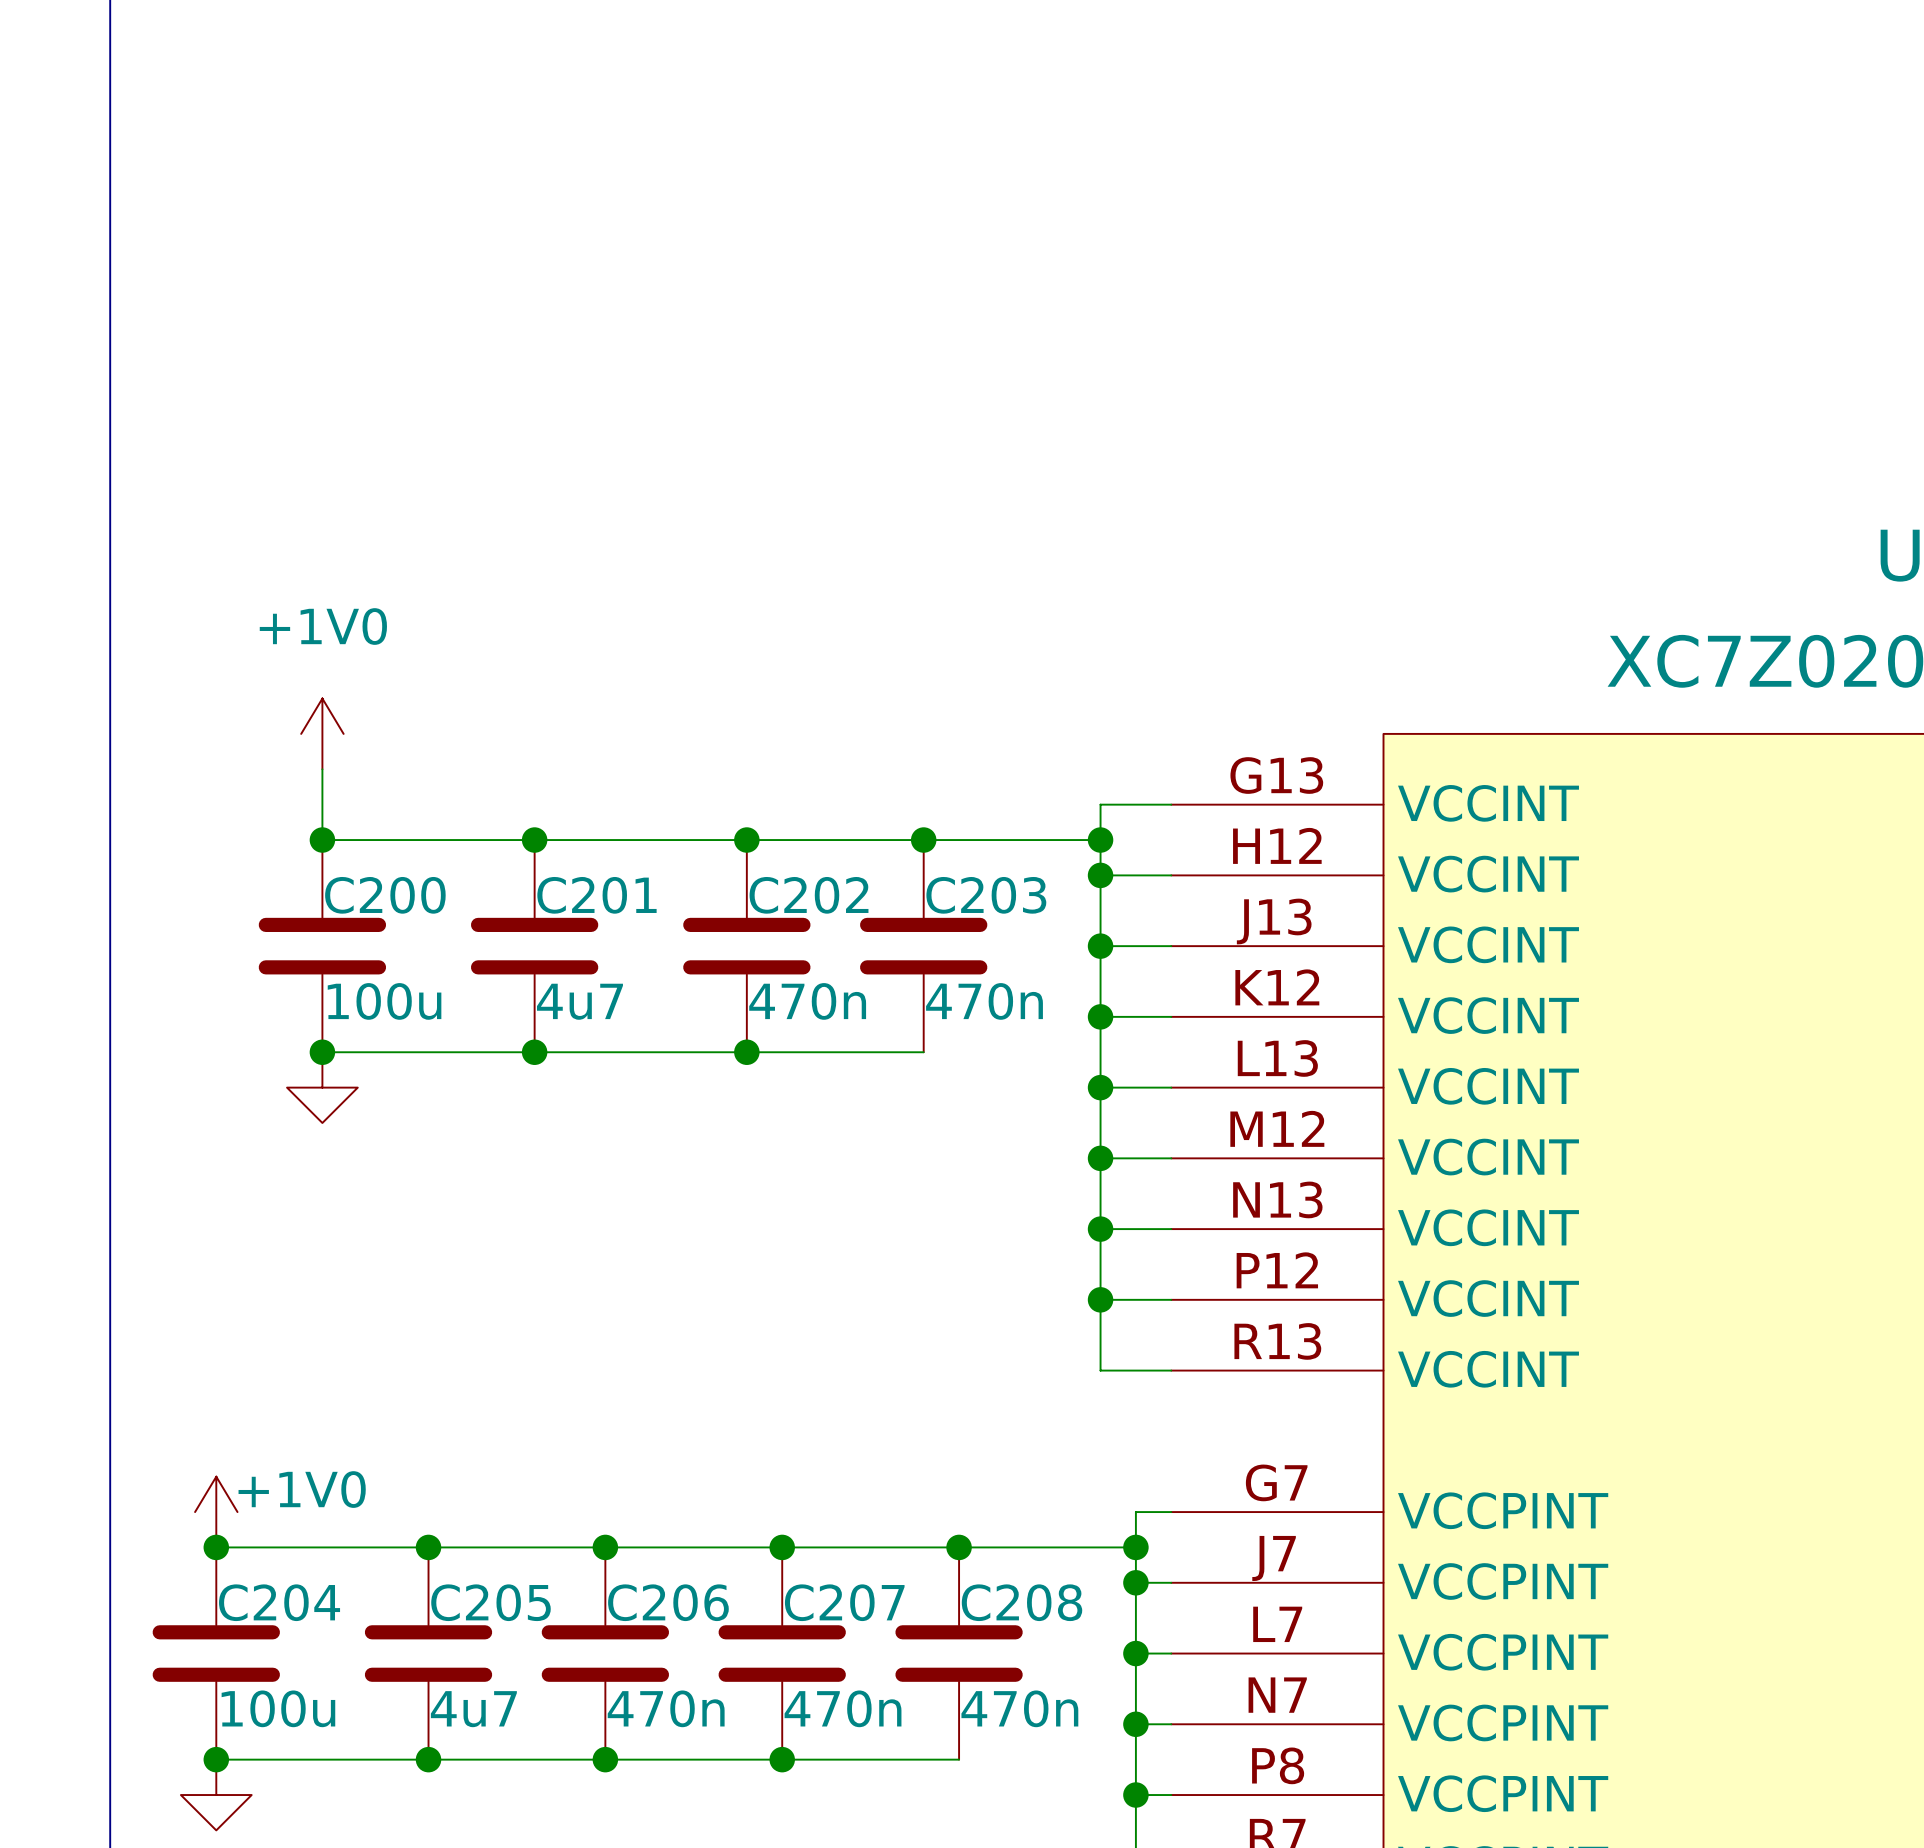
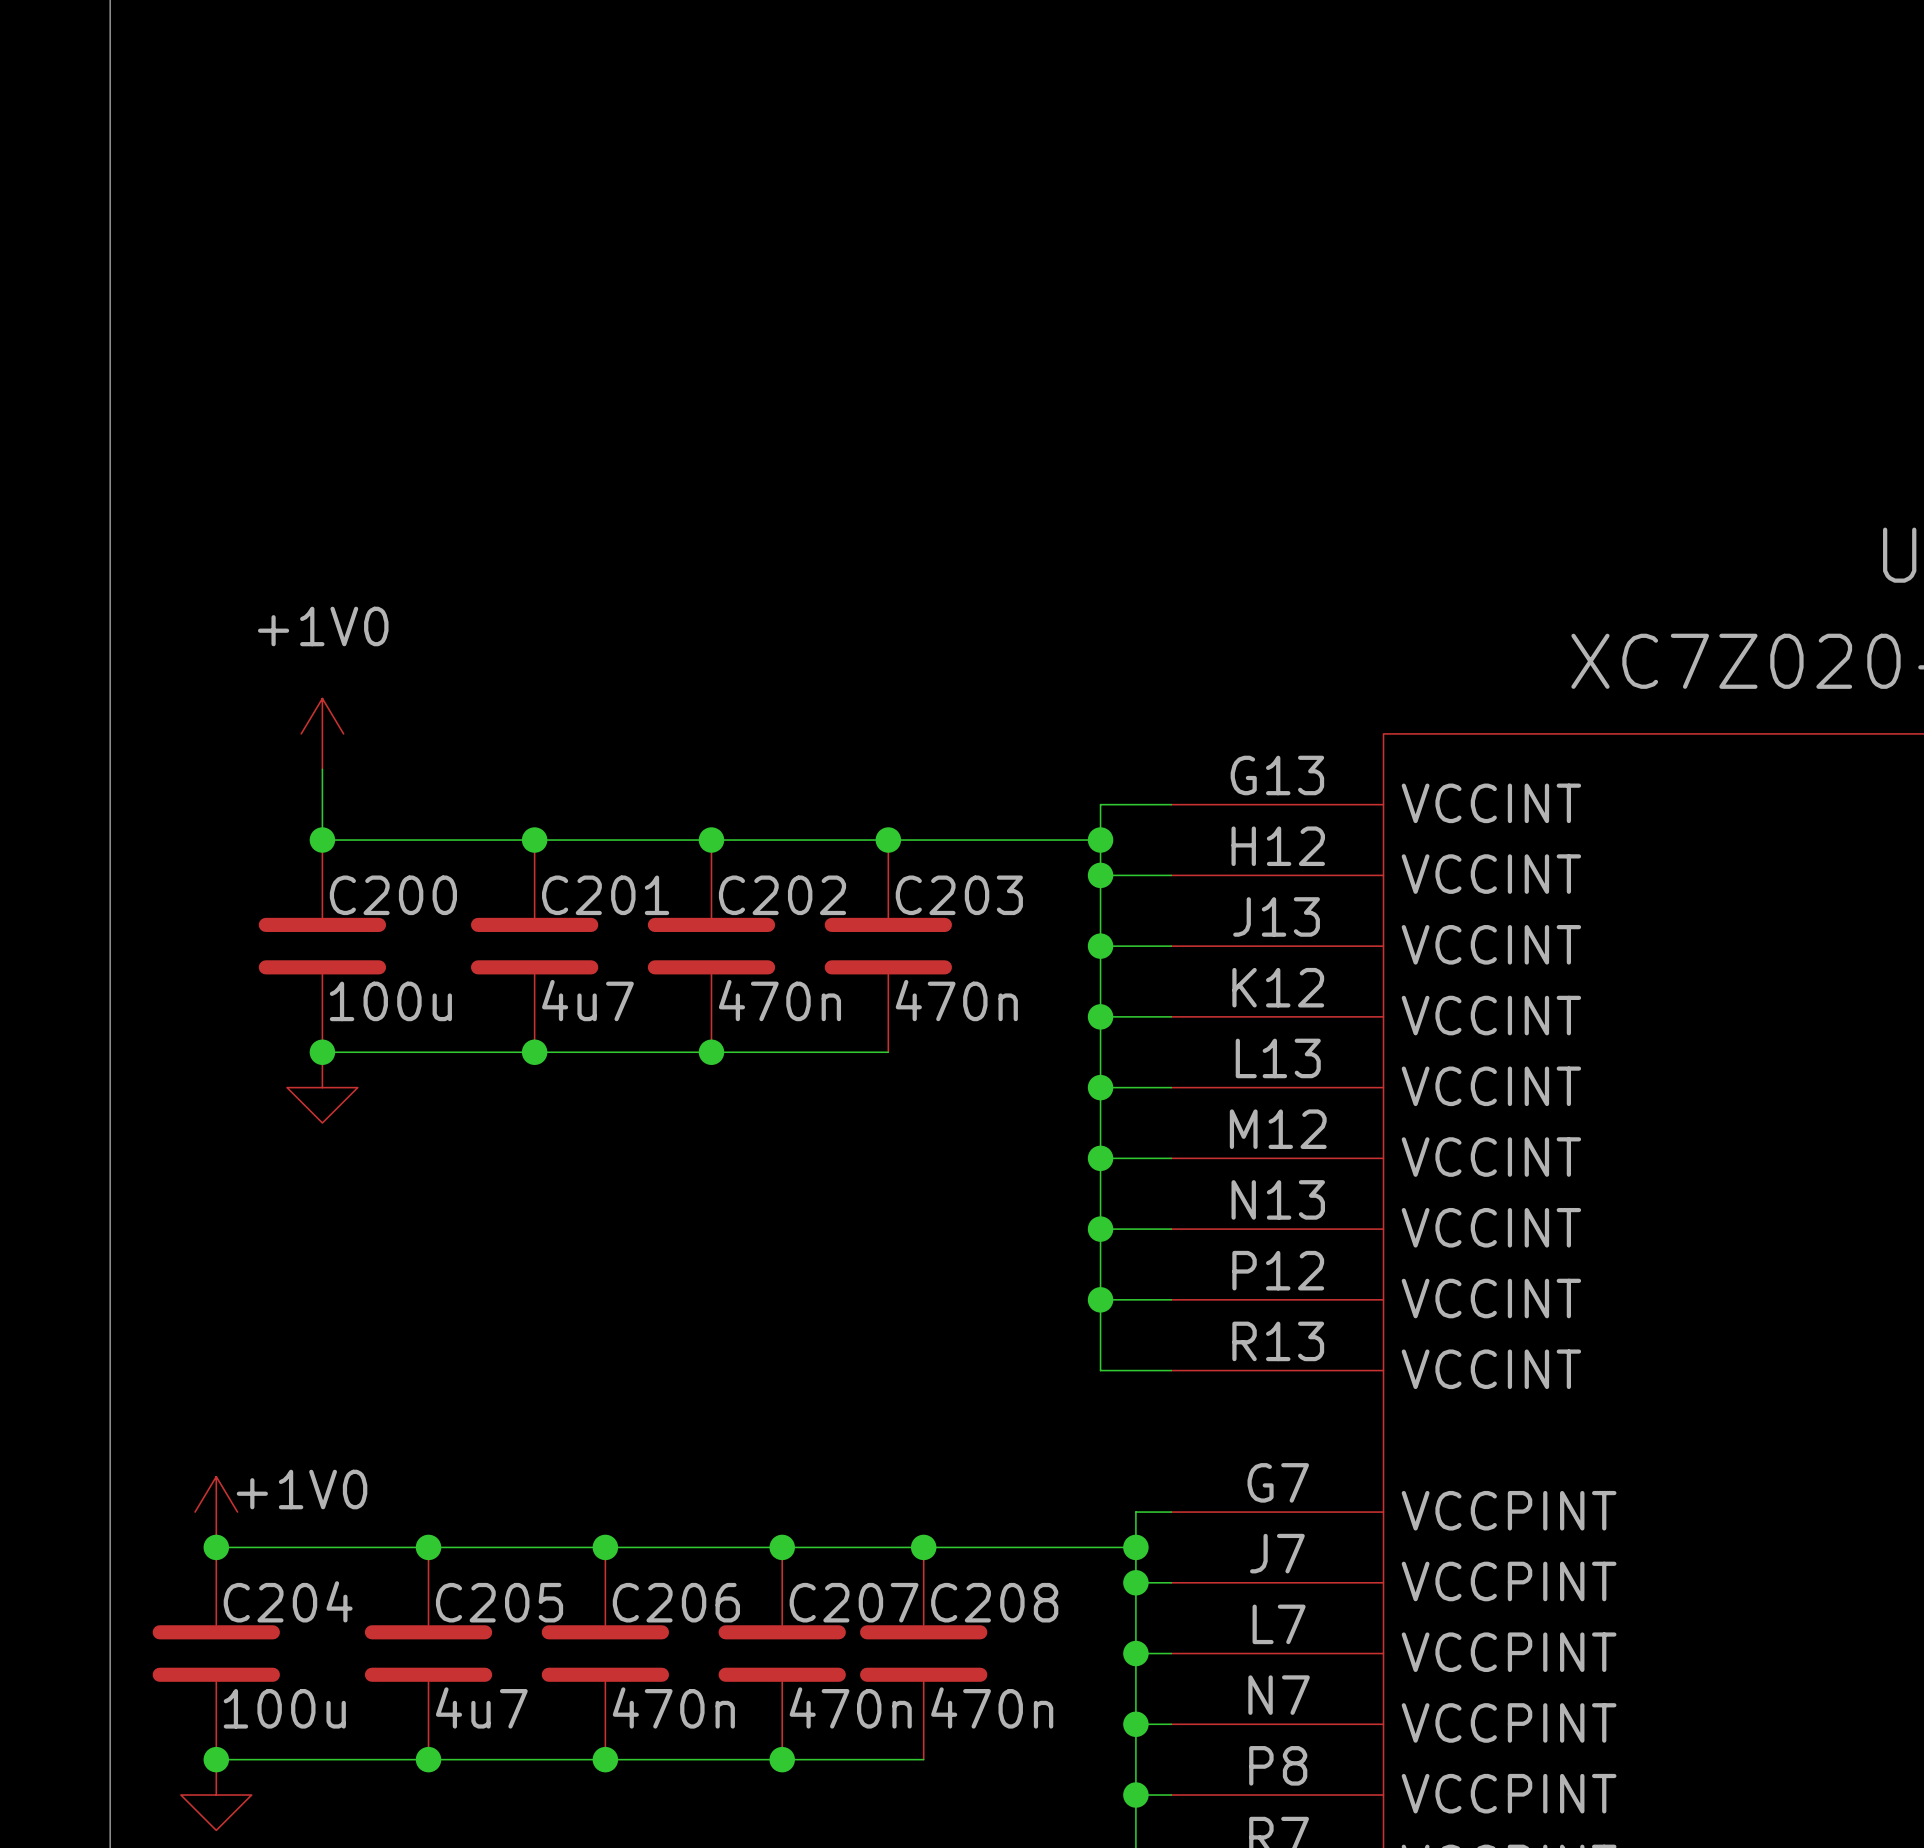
junction position: (746, 840) -> (711, 840)
junction position: (923, 840) -> (888, 840)
C202 position: (746, 946) -> (711, 946)
C203 position: (923, 946) -> (888, 946)
junction position: (746, 1052) -> (711, 1052)
wire: (888, 1052) (923, 1052) -> none
junction position: (959, 1547) -> (923, 1547)
C208 position: (959, 1653) -> (923, 1653)
wire: (923, 1759) (959, 1759) -> none

